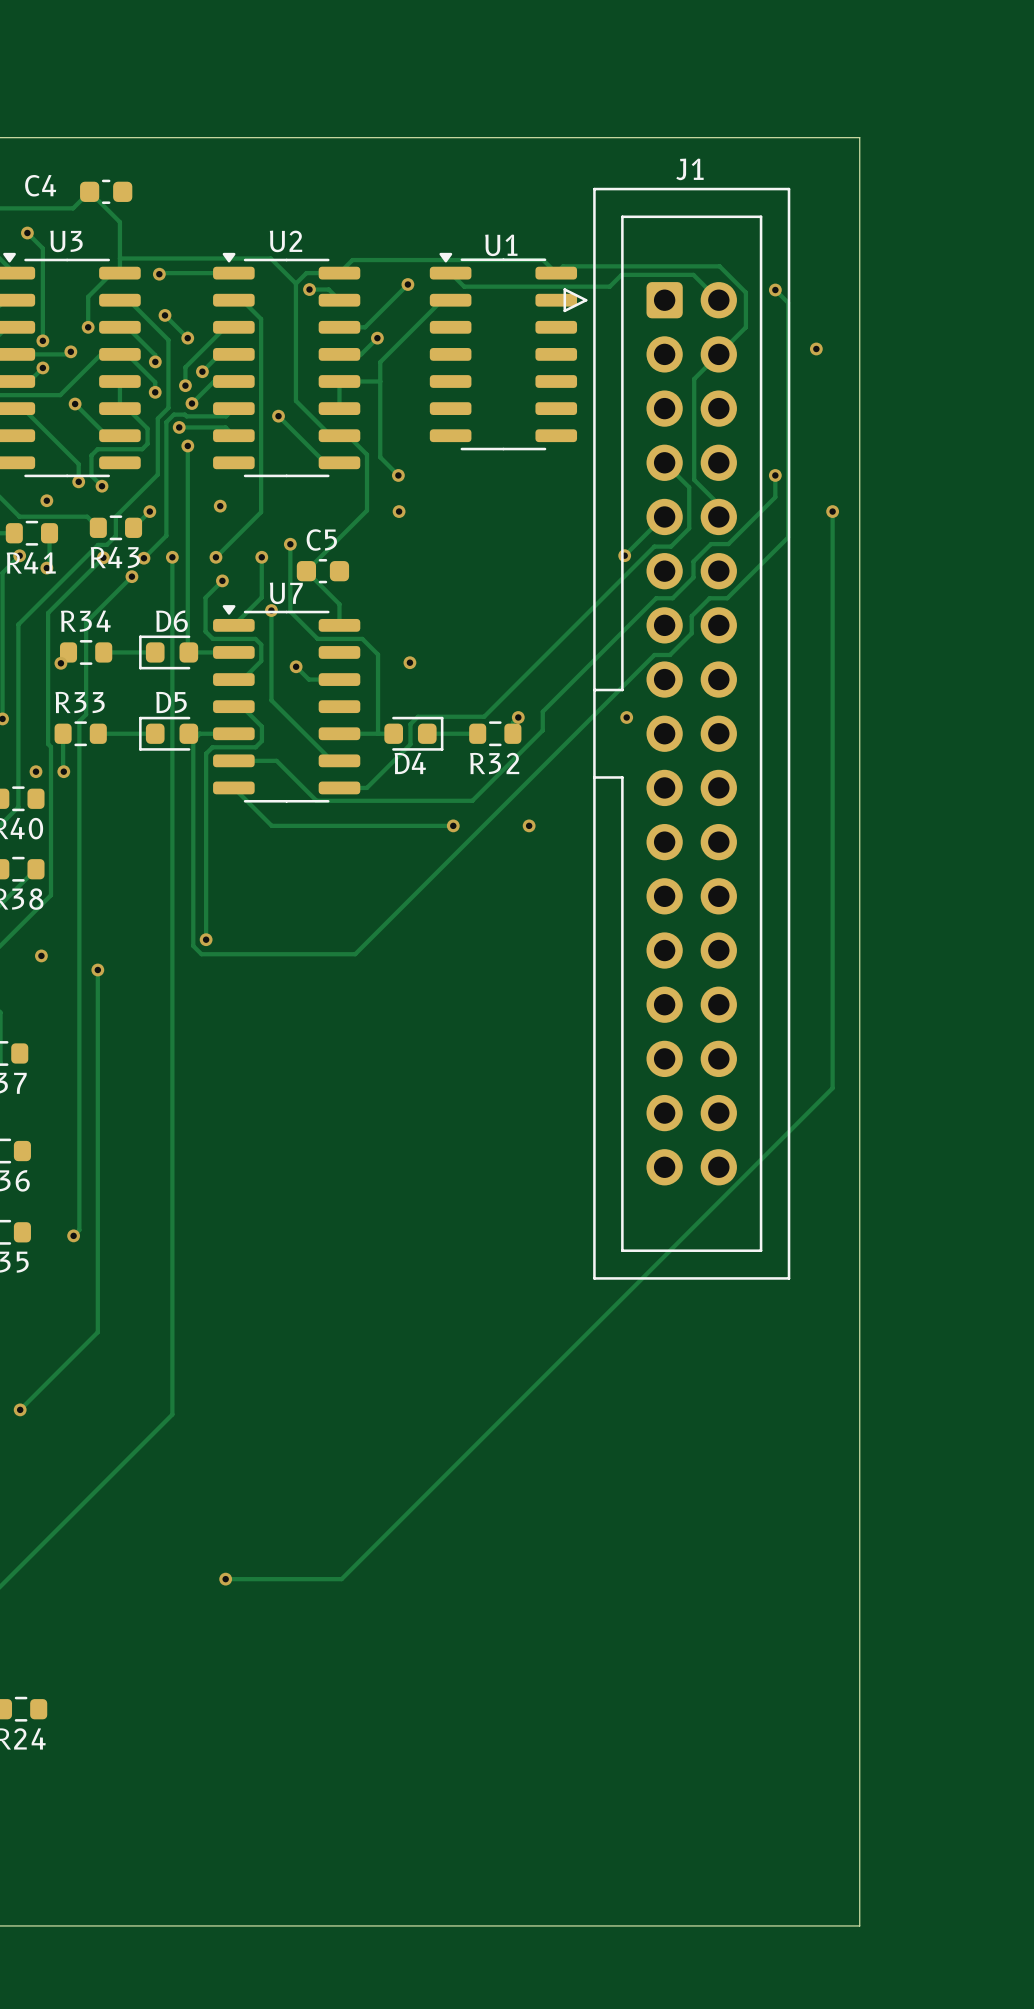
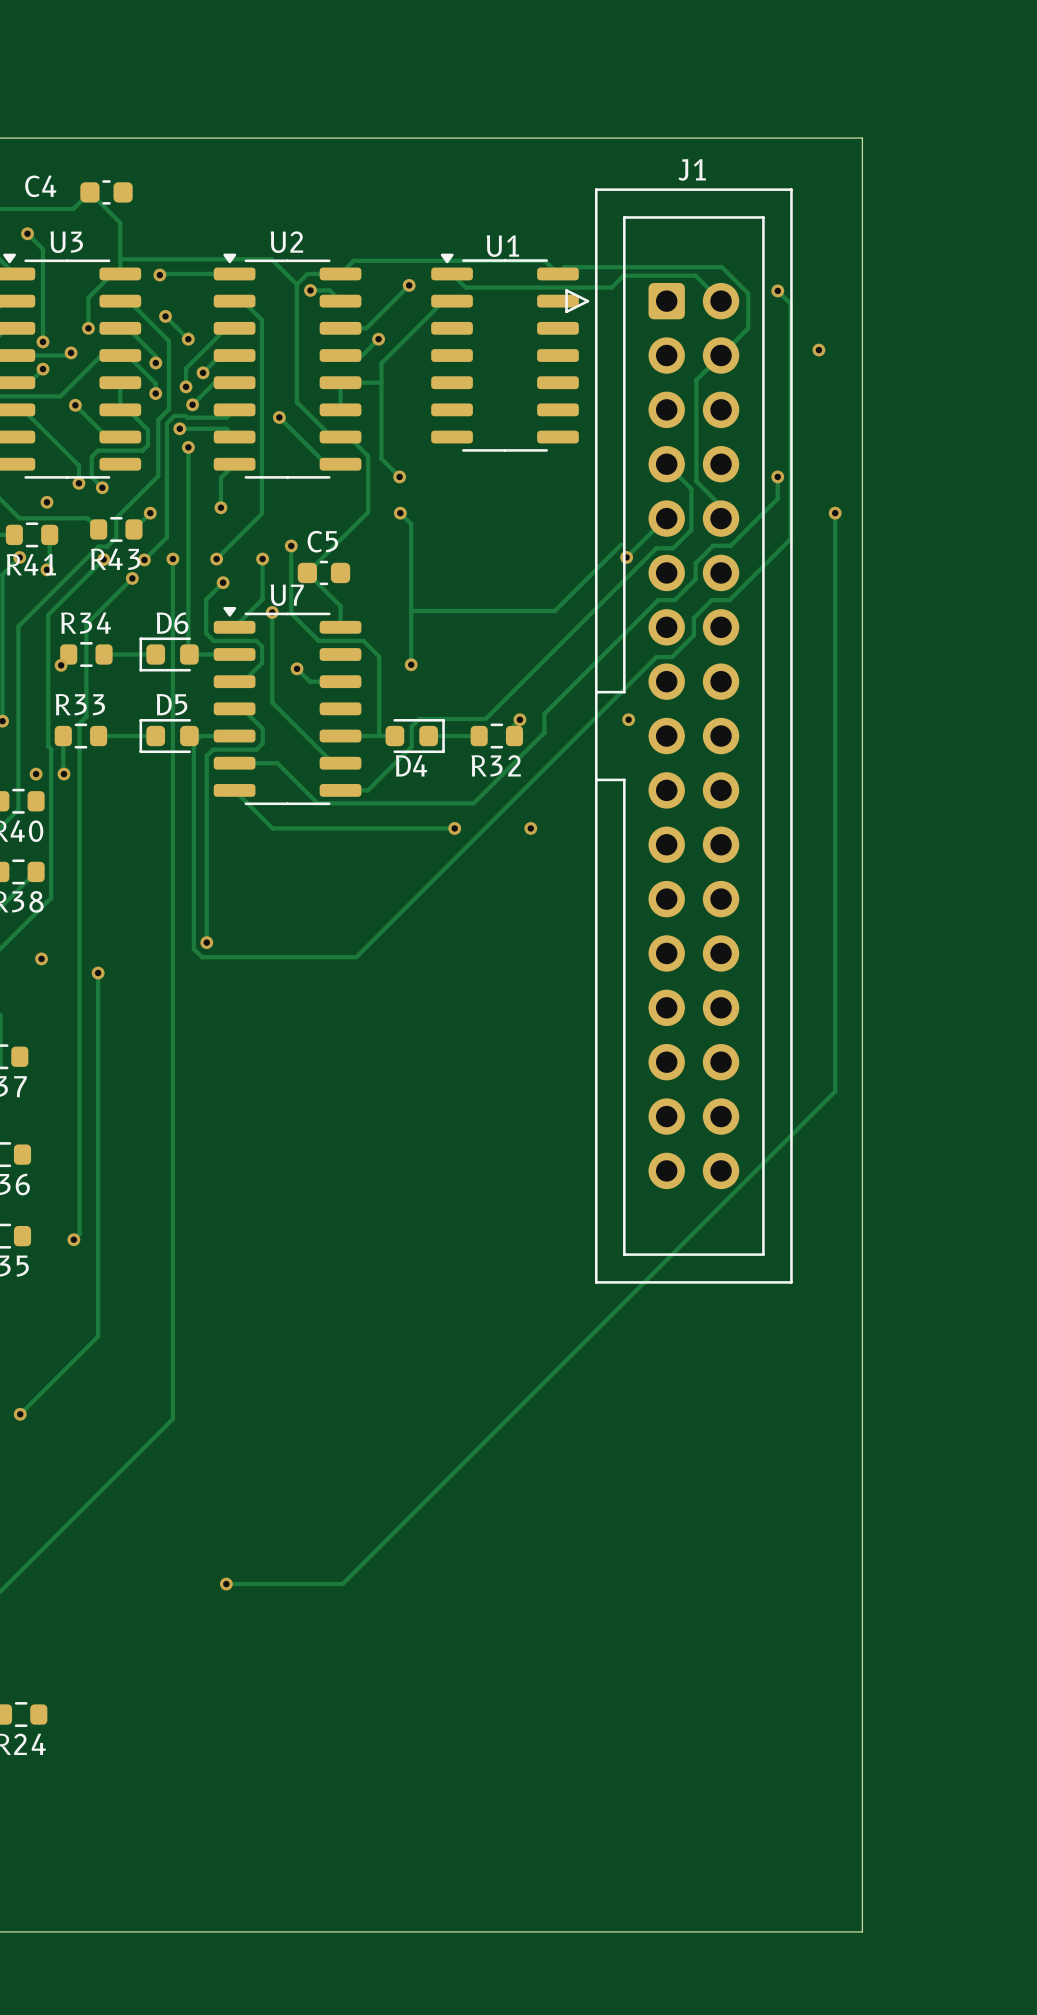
track: none -> (234, 464) (220, 477) (220, 507)
track: none -> (400, 513) (411, 524) (411, 664)
track: none -> (621, 544) (554, 611) (411, 611)

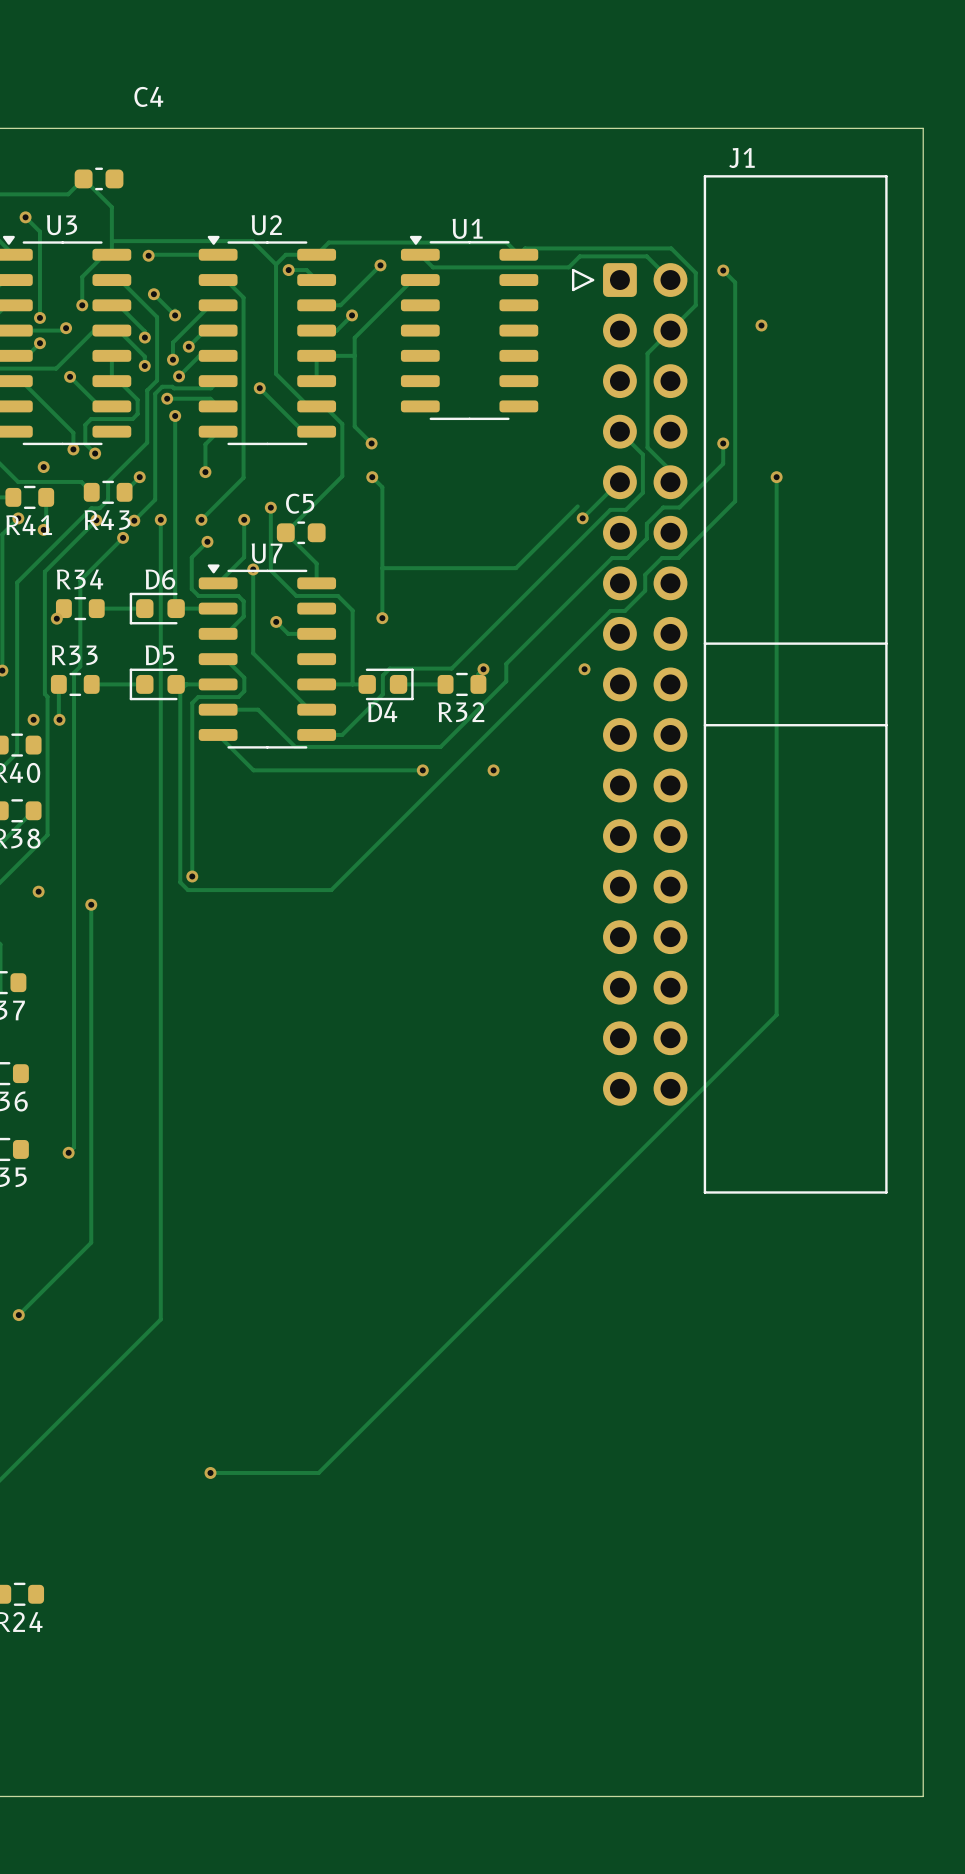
board edge: (862, 138) (862, 1931) -> (801, 128) (923, 128) (923, 1796) (801, 1796)
C4 name position: C4 (40, 186) -> C4 (148, 96)
J1 footprint: [565, 188, 793, 1284] -> [571, 175, 888, 1194]

